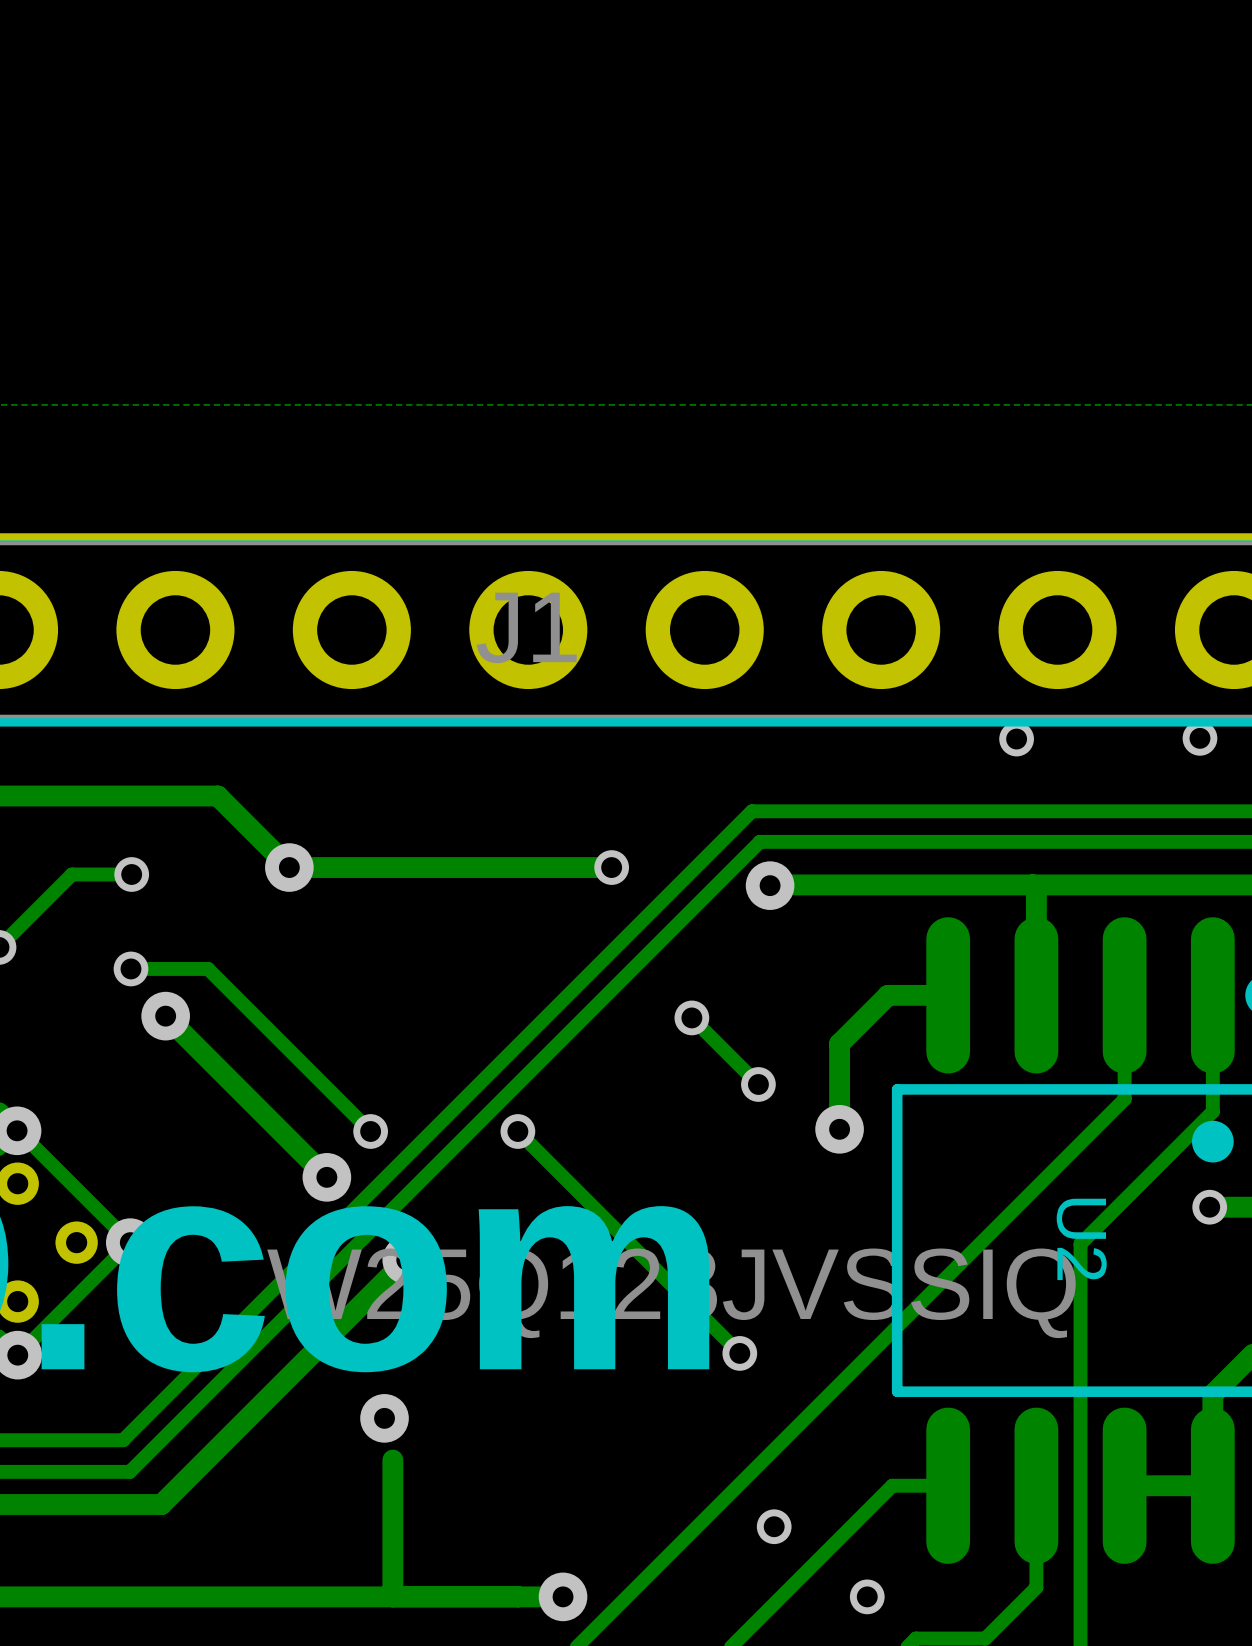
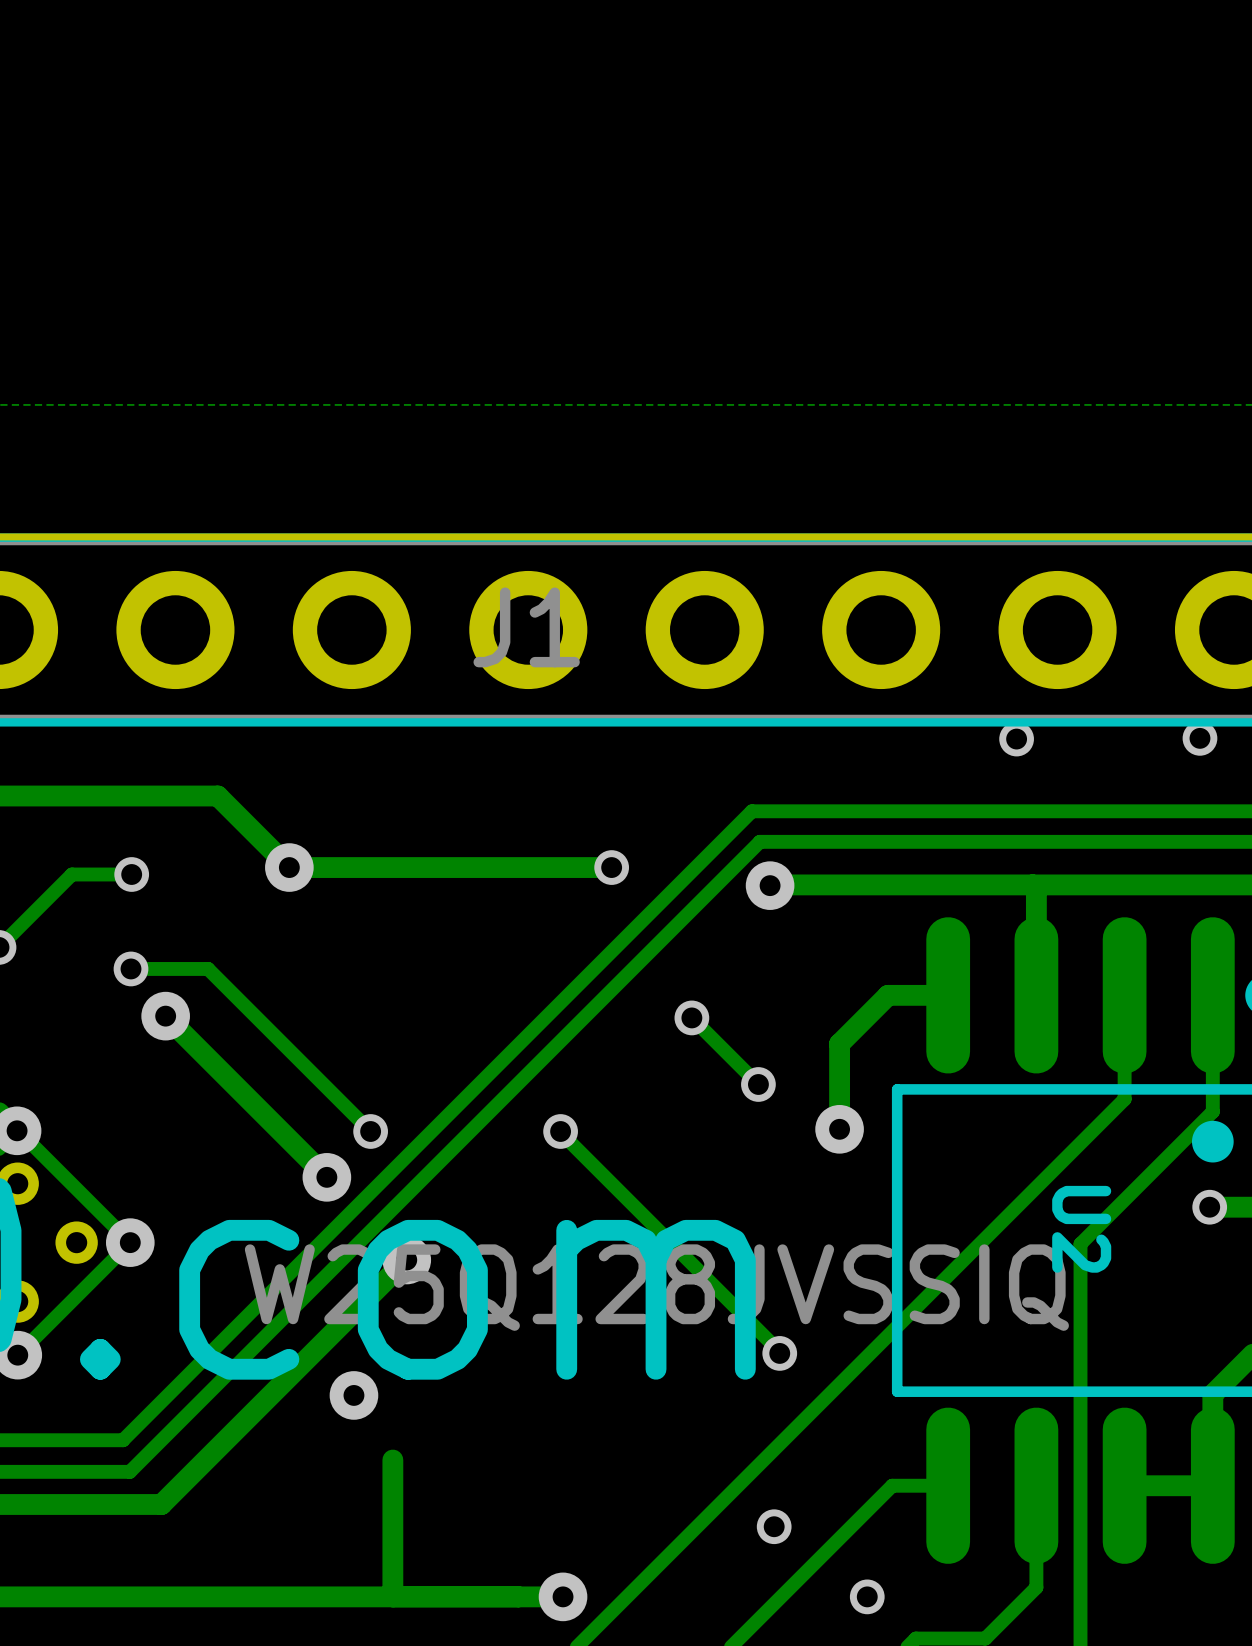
track: (517, 1131) (739, 1353) -> none
via position: (517, 1131) -> (560, 1131)
track: none -> (560, 1132) (779, 1353)
via position: (739, 1353) -> (779, 1353)
via position: (384, 1418) -> (353, 1395)

